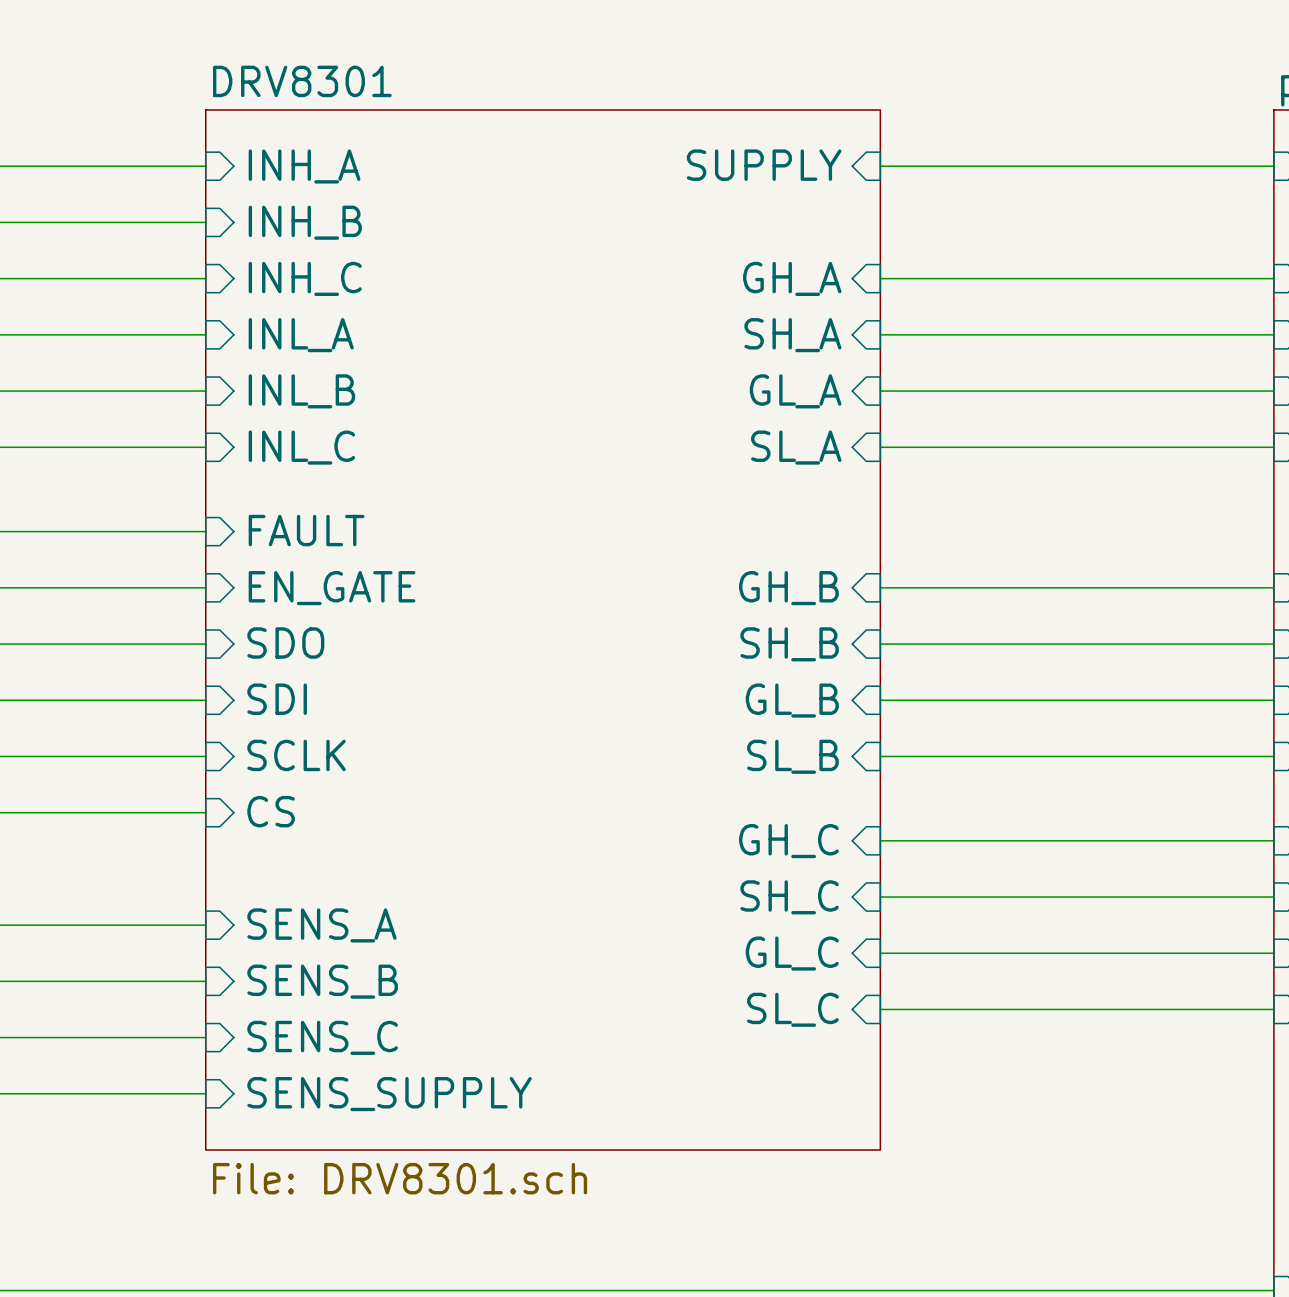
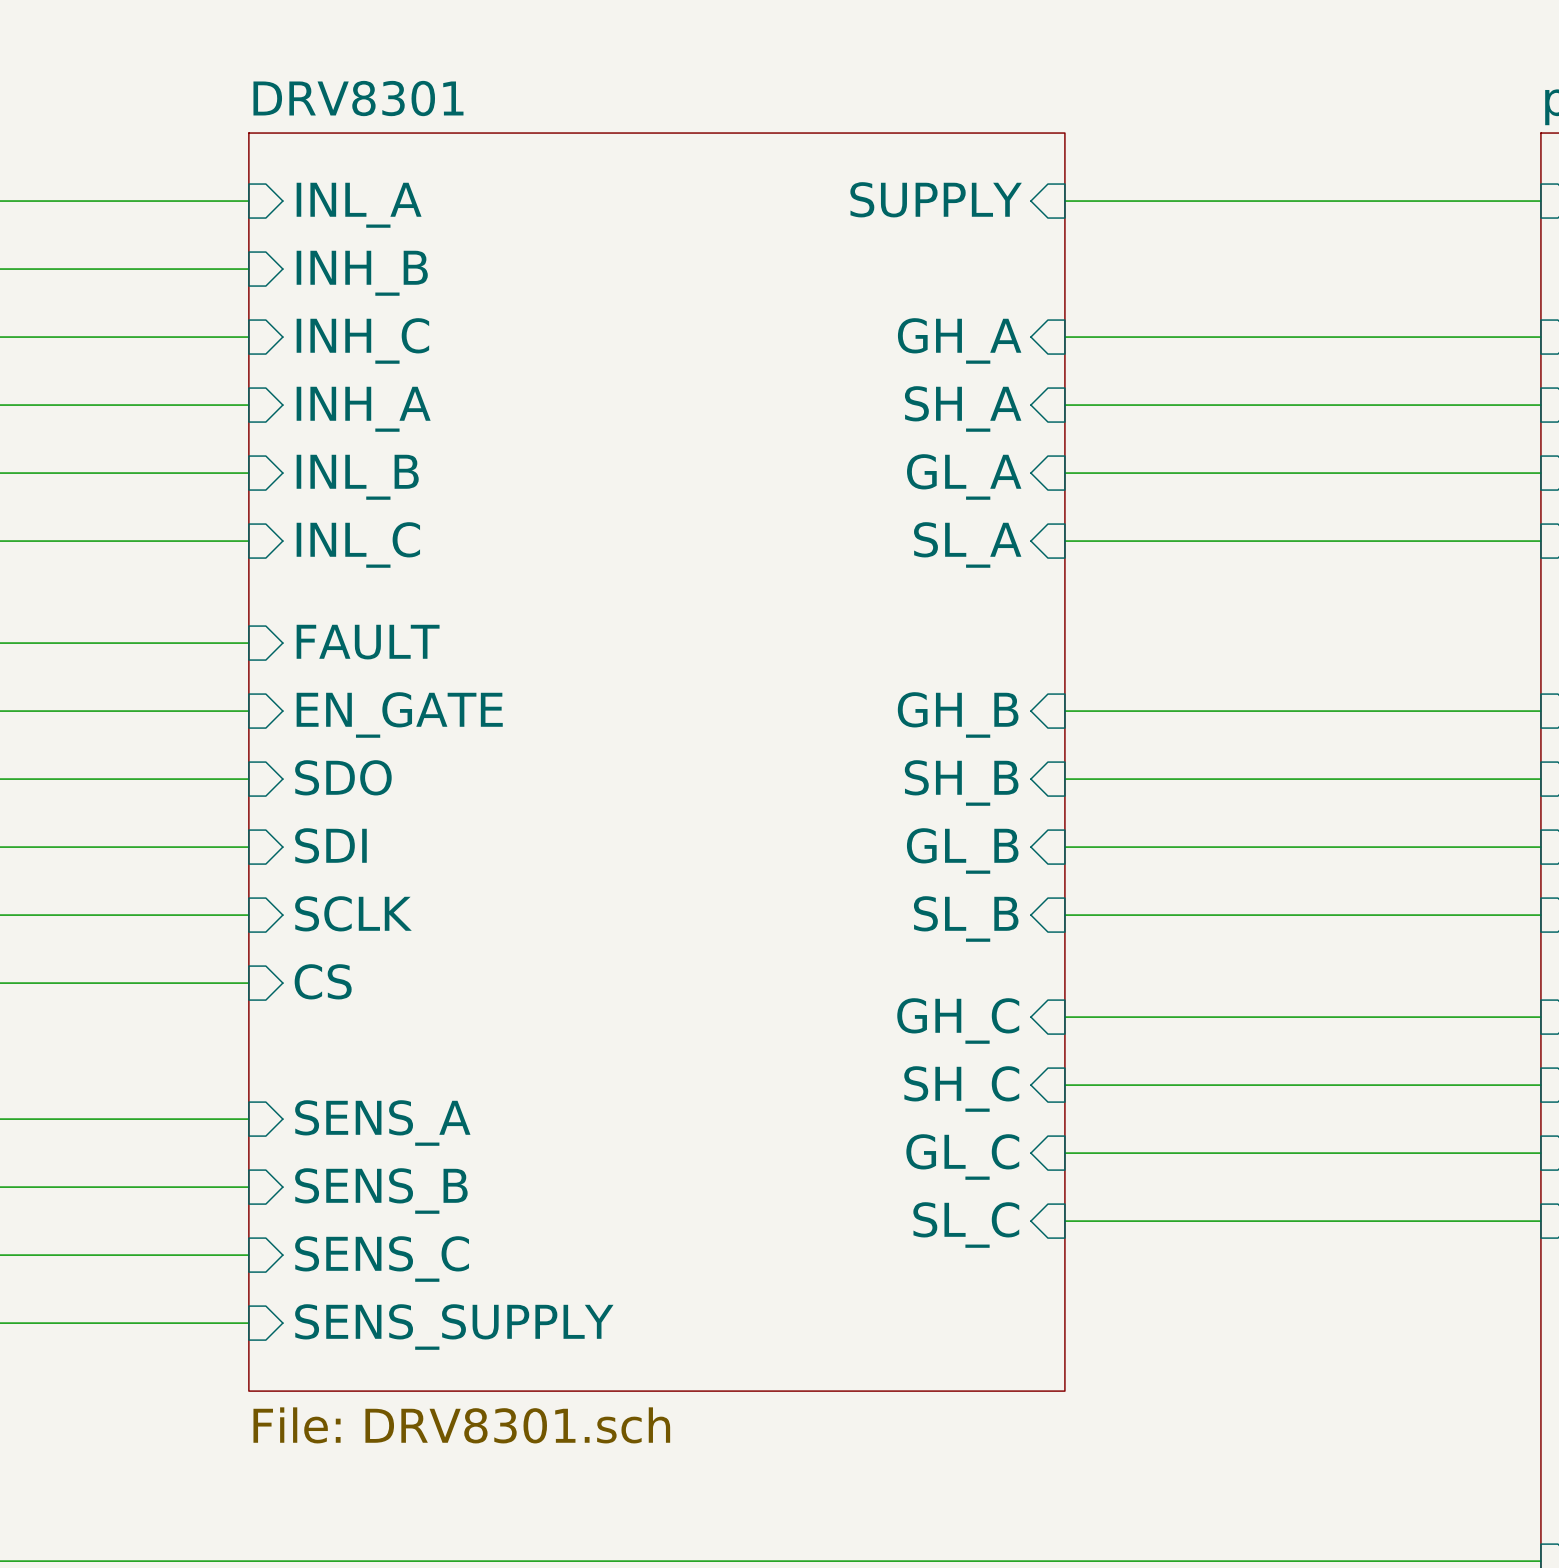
sheet pin: INH_A (304, 166) -> INL_A (359, 205)
sheet pin: INL_A (301, 335) -> INH_A (363, 409)

